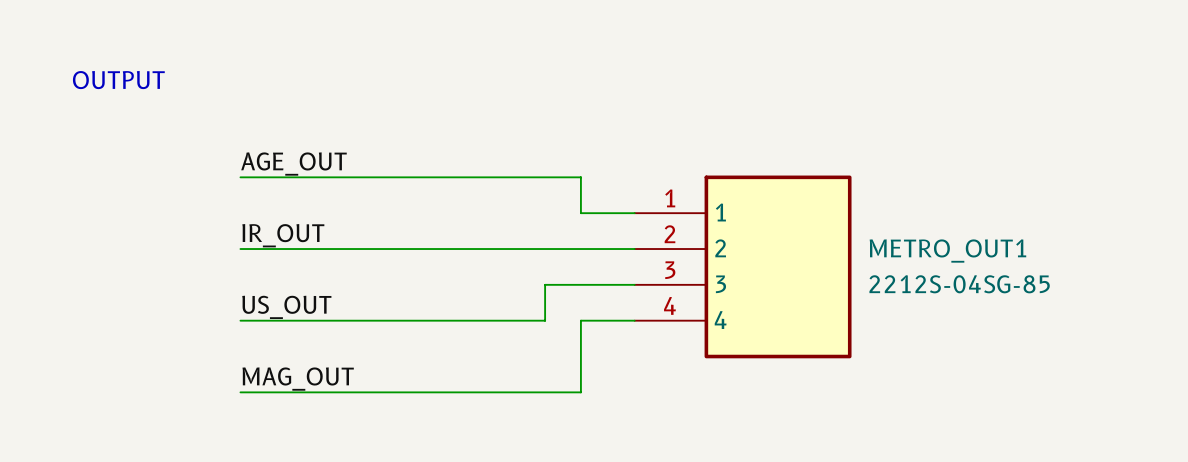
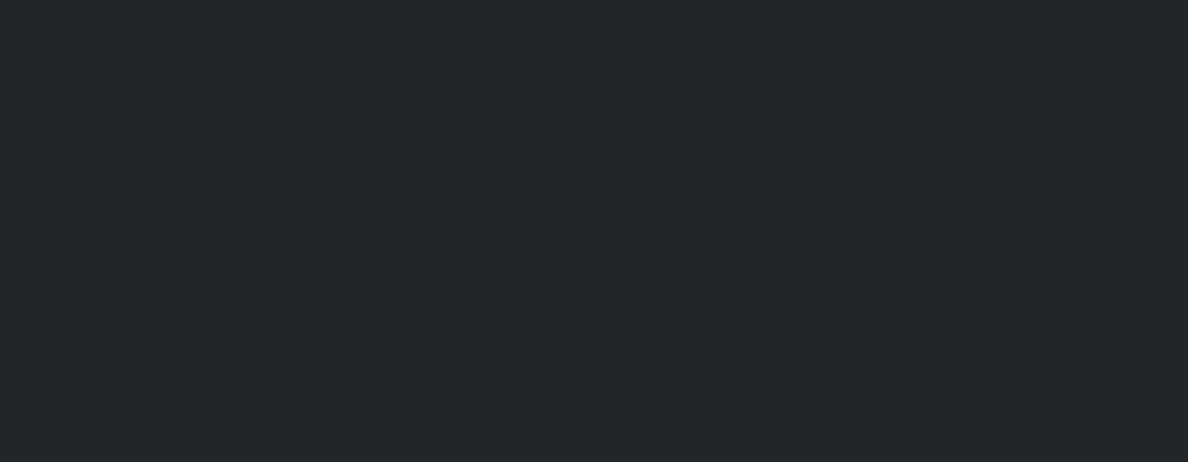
text: OUTPUT (118, 80) -> none
label: AGE_OUT (293, 164) -> none
wire: (240, 177) (580, 177) (580, 213) (634, 213) -> none
label: IR_OUT (283, 235) -> none
wire: (240, 249) (634, 249) -> none
METRO_OUT1: 2212S-04SG-85 (743, 266) -> none
wire: (634, 284) (545, 284) (545, 320) (240, 320) -> none
label: US_OUT (286, 307) -> none
wire: (634, 320) (580, 320) (580, 392) (240, 392) -> none
label: MAG_OUT (298, 379) -> none

